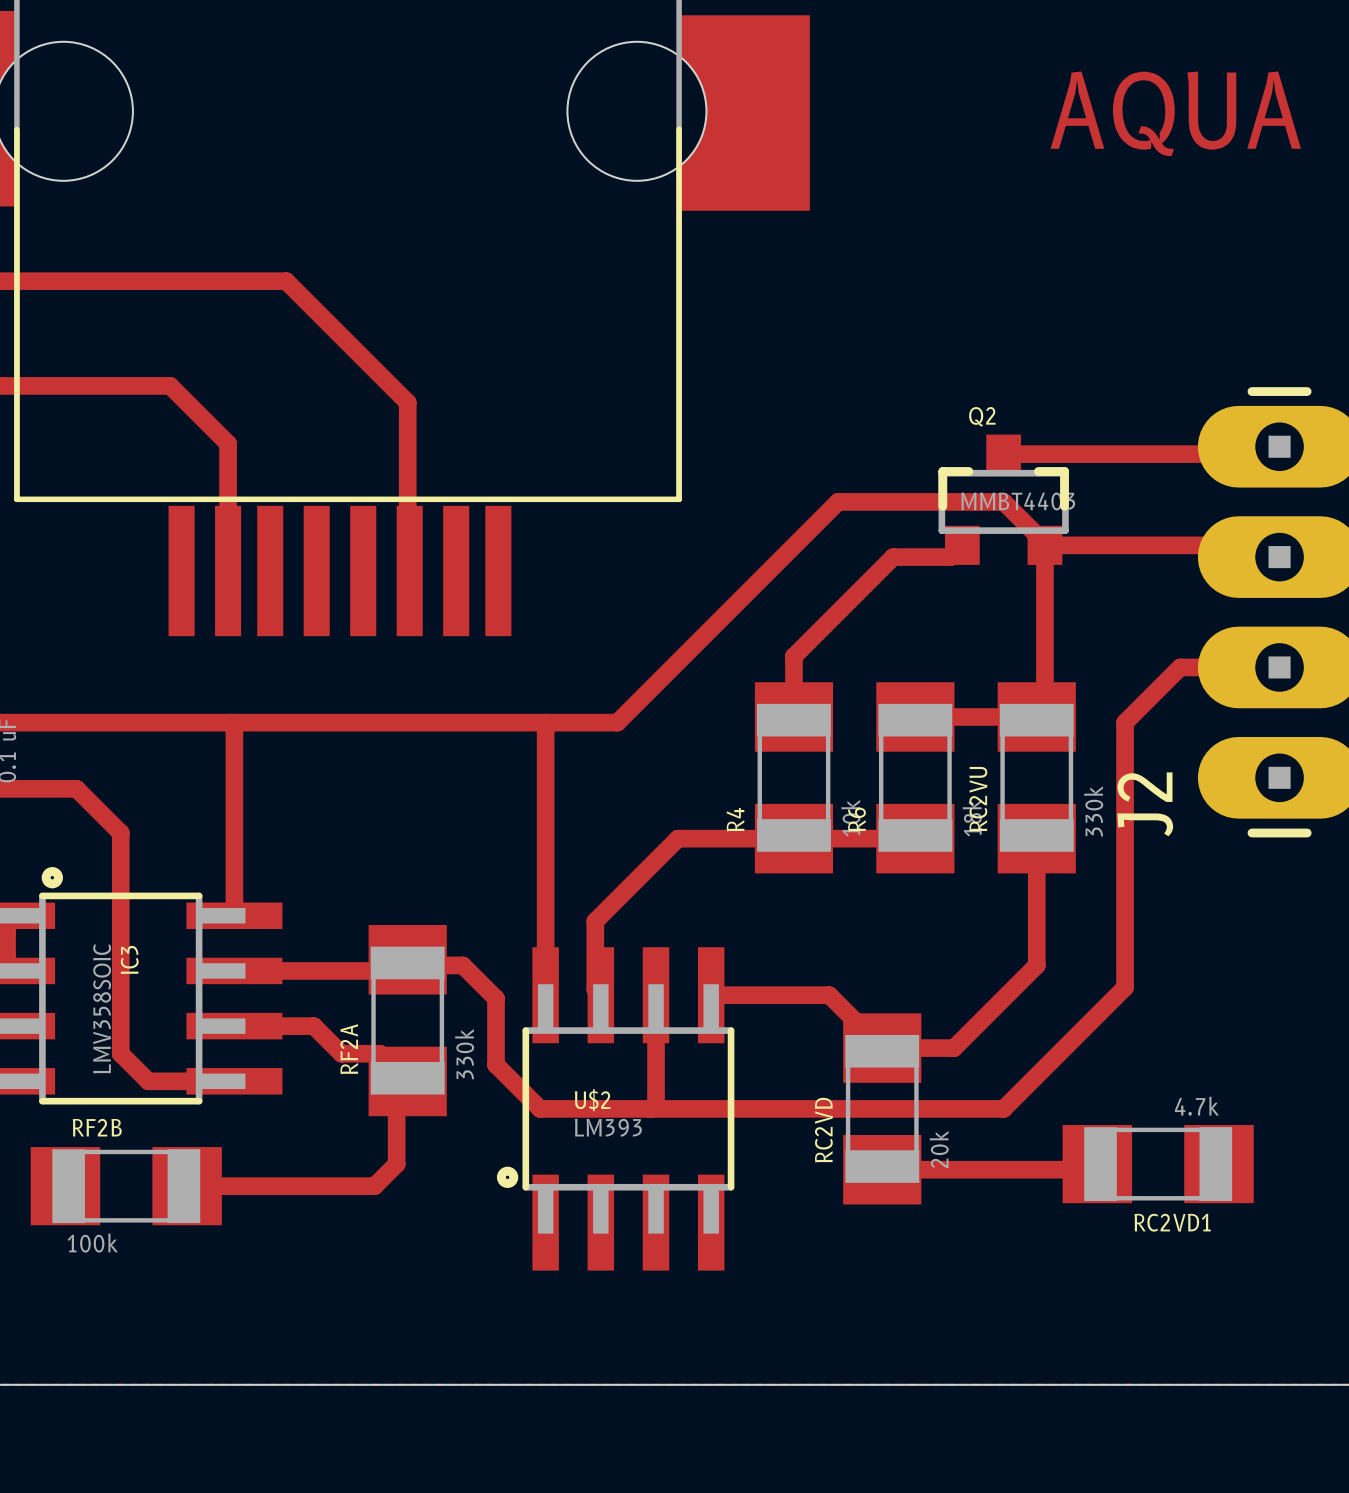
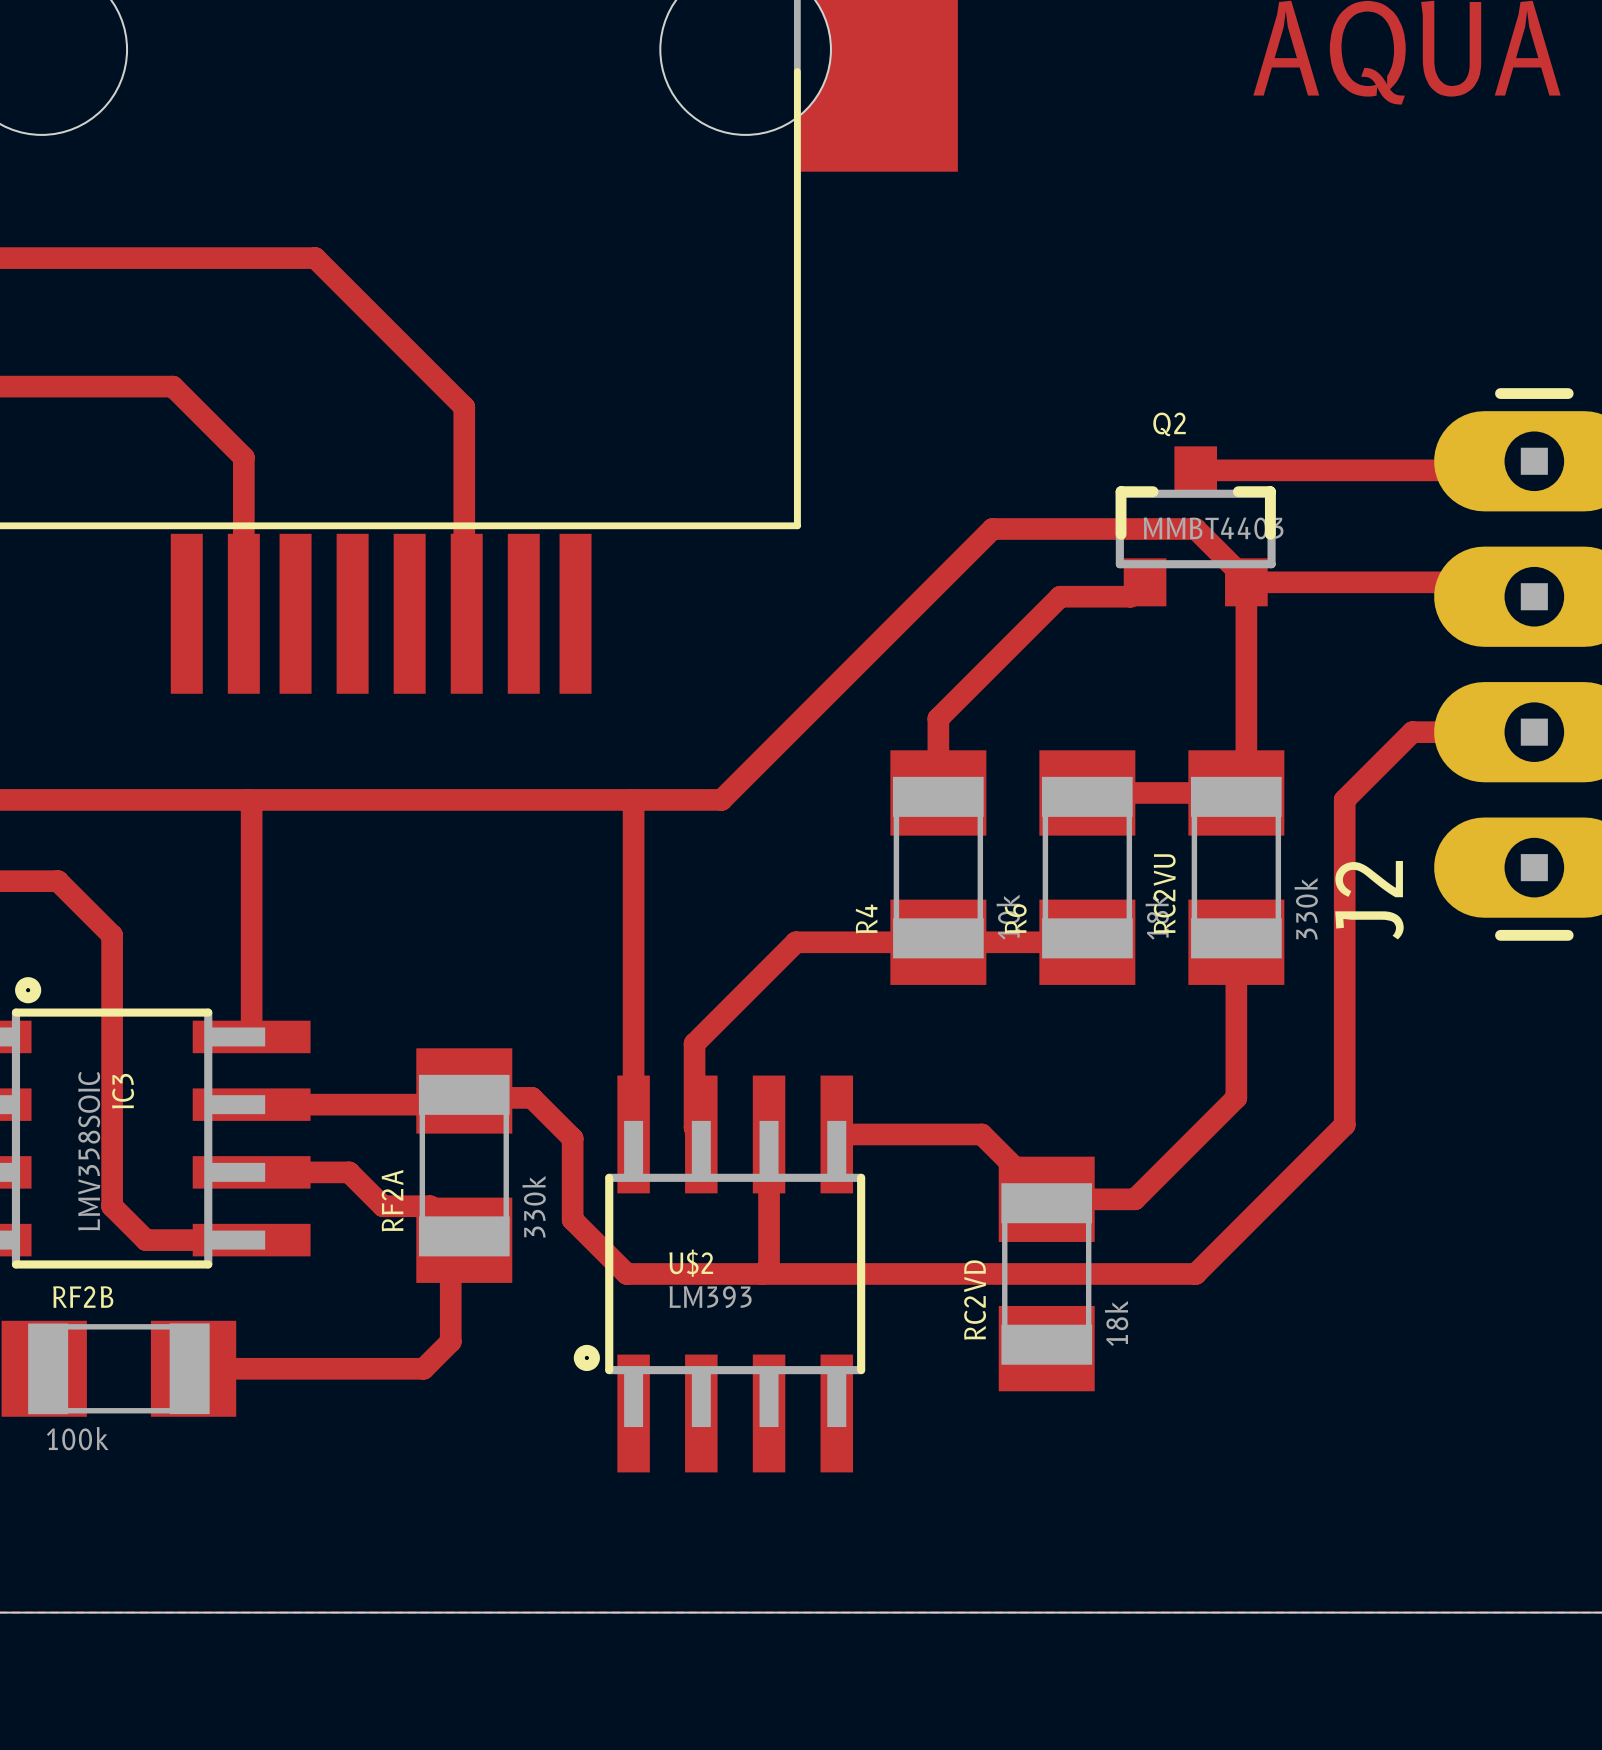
RC2VD value: 20k (939, 1149) -> 18k (1116, 1323)
top track: (1097, 1164) (1097, 1169) (882, 1169) -> none
RC2VD1: 4.7k (1158, 1164) -> none

